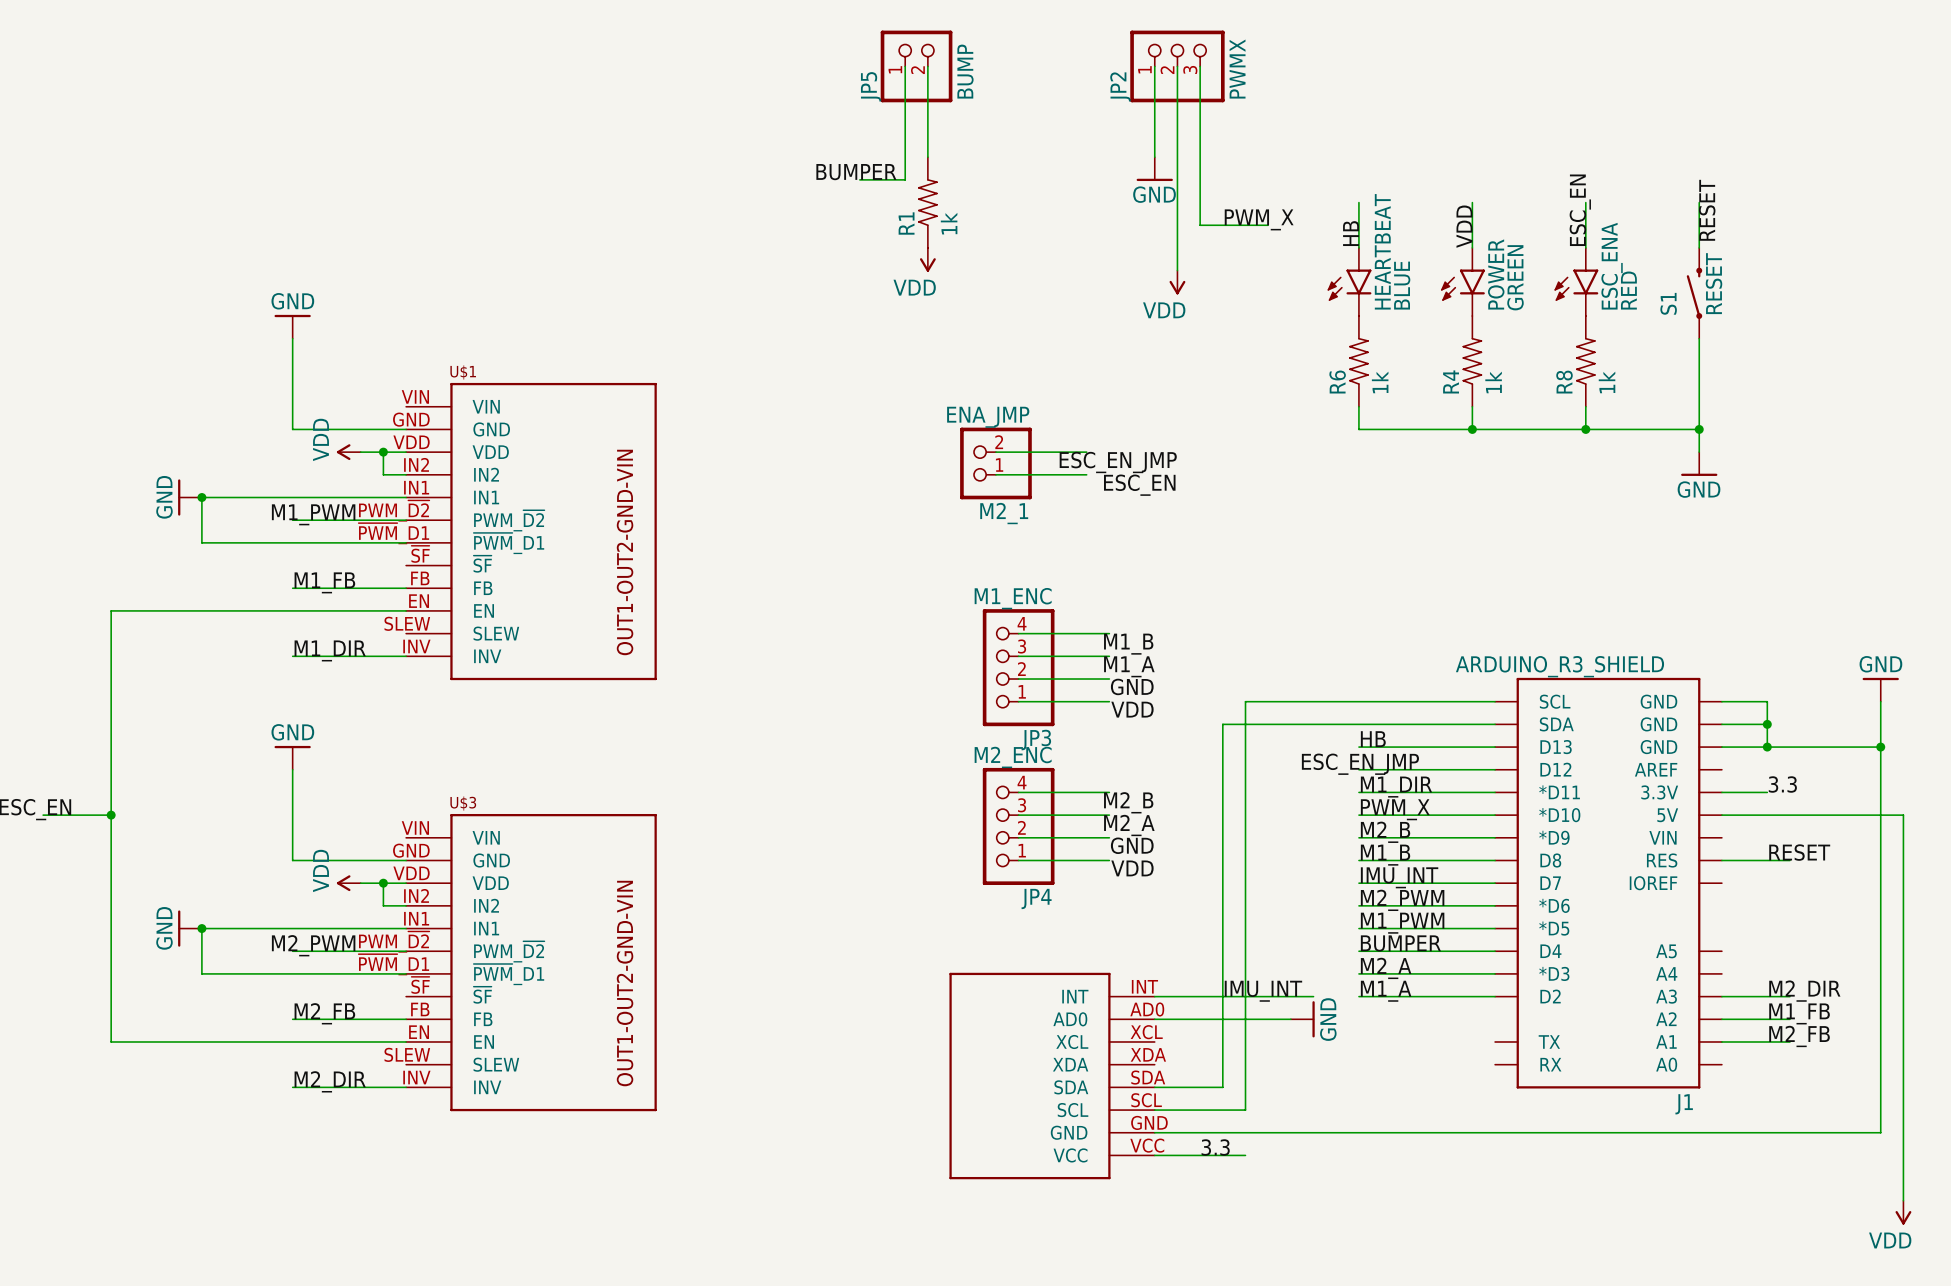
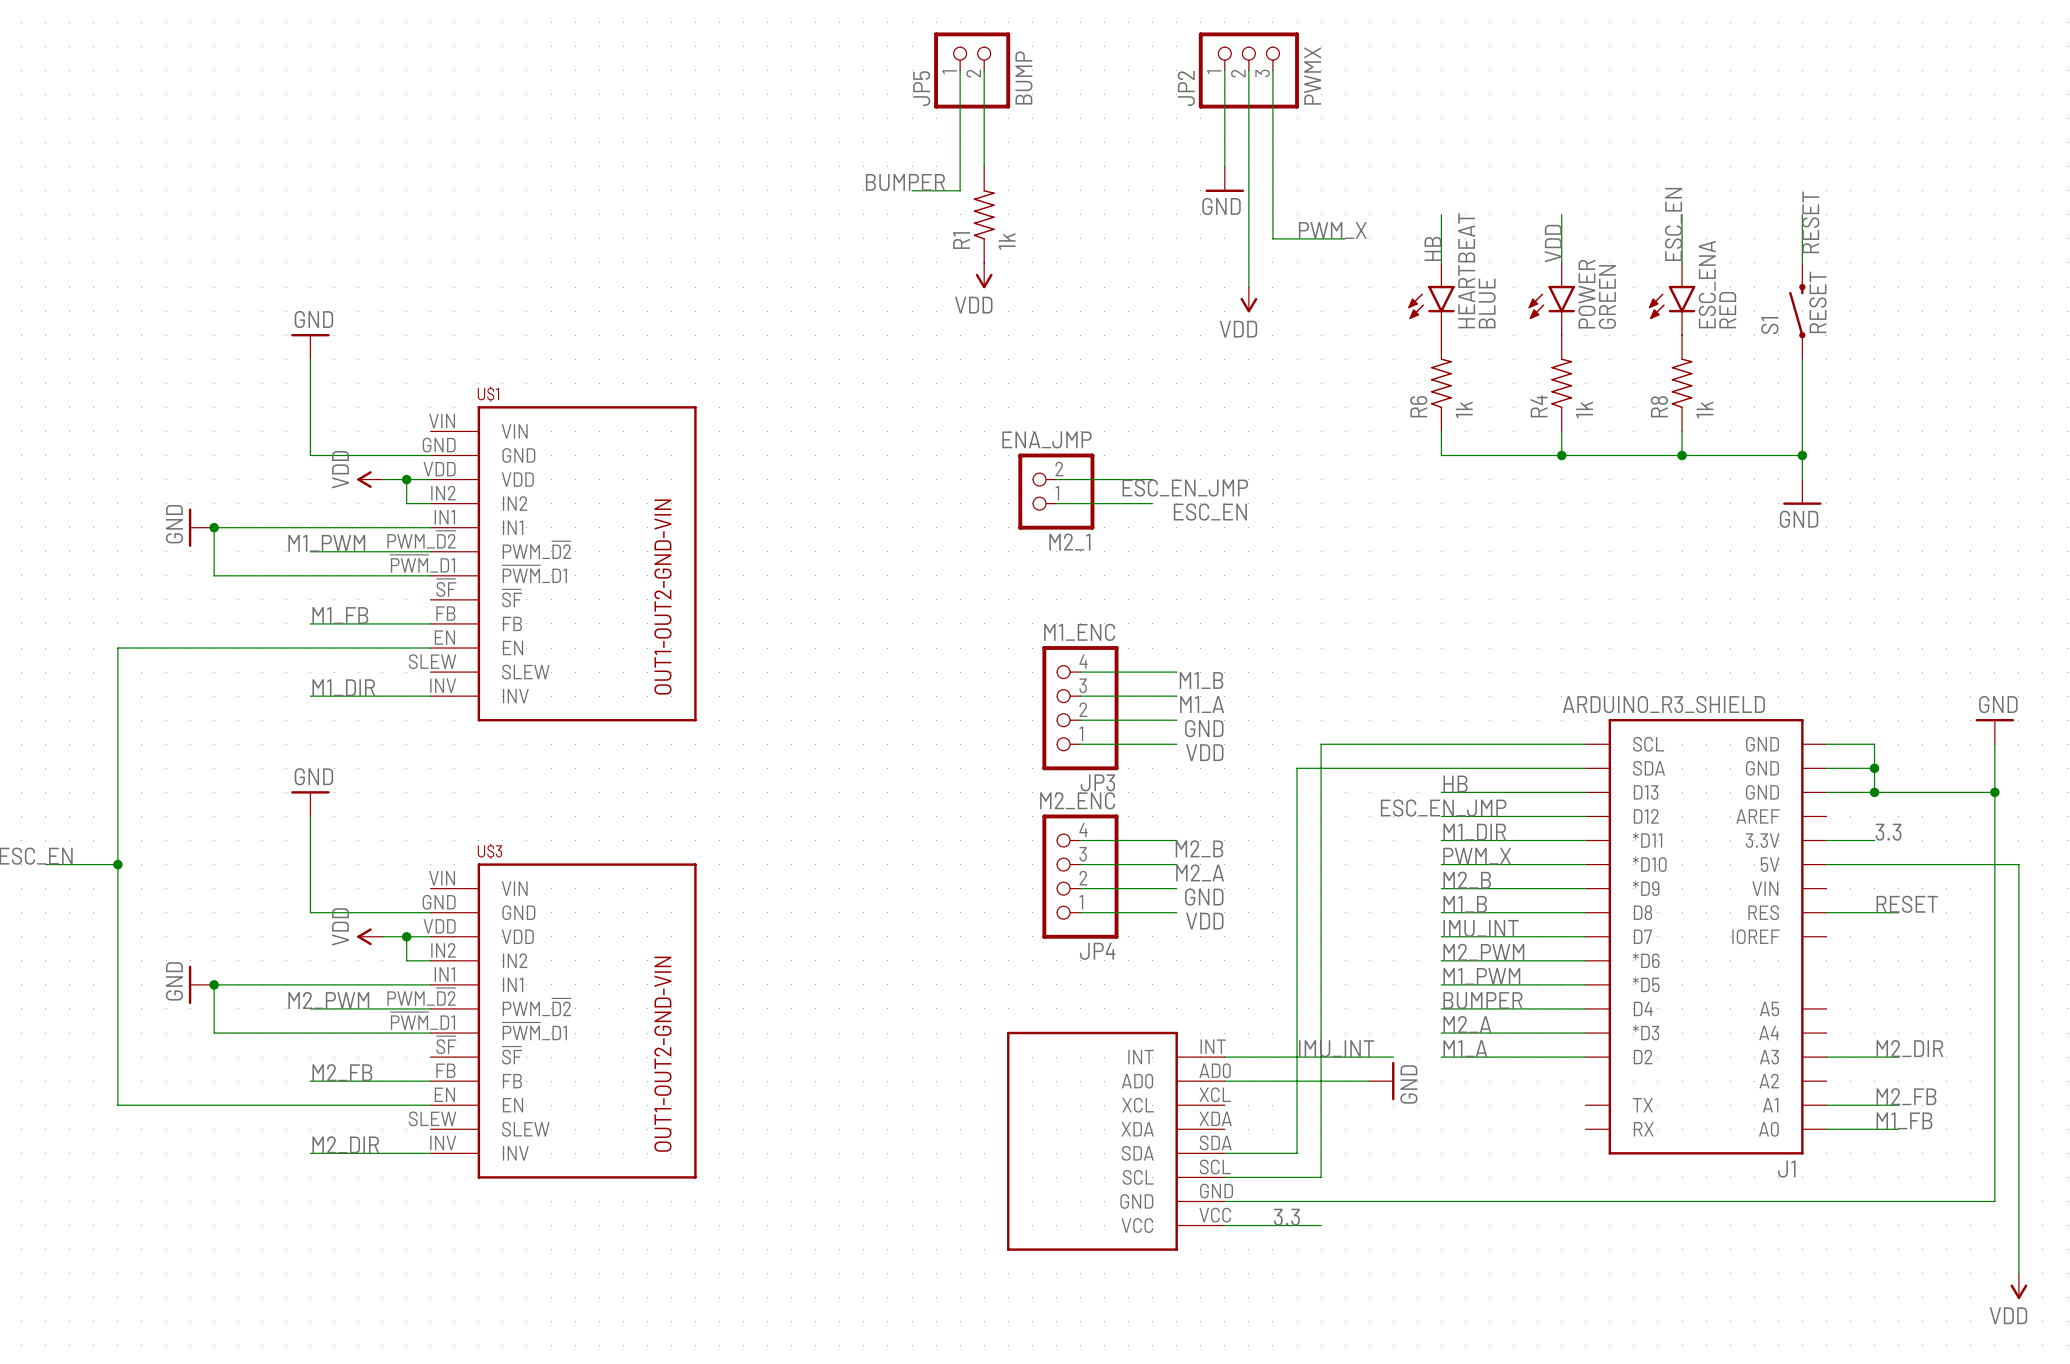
label position: M1_FB (1799, 1013) -> M1_FB (1904, 1120)
wire: (1721, 1019) (1789, 1019) -> (1826, 1129) (1898, 1129)

